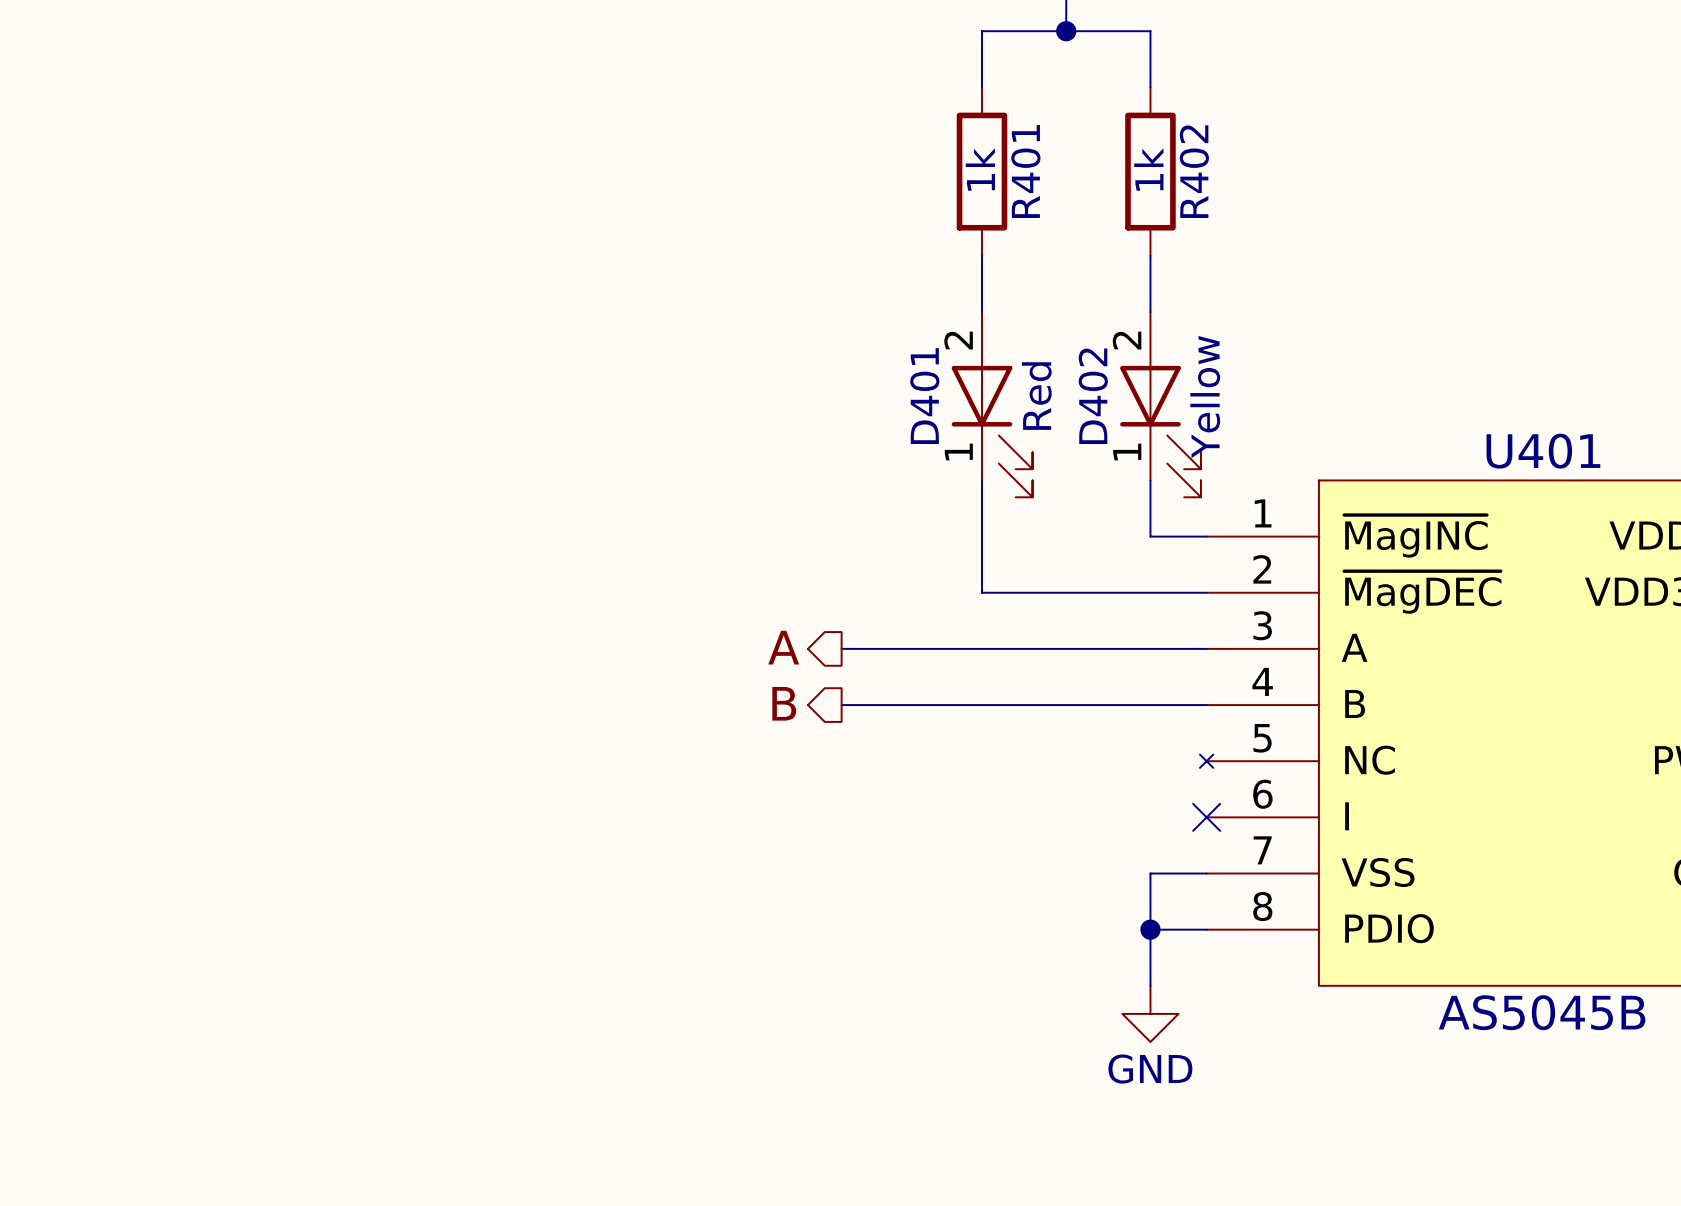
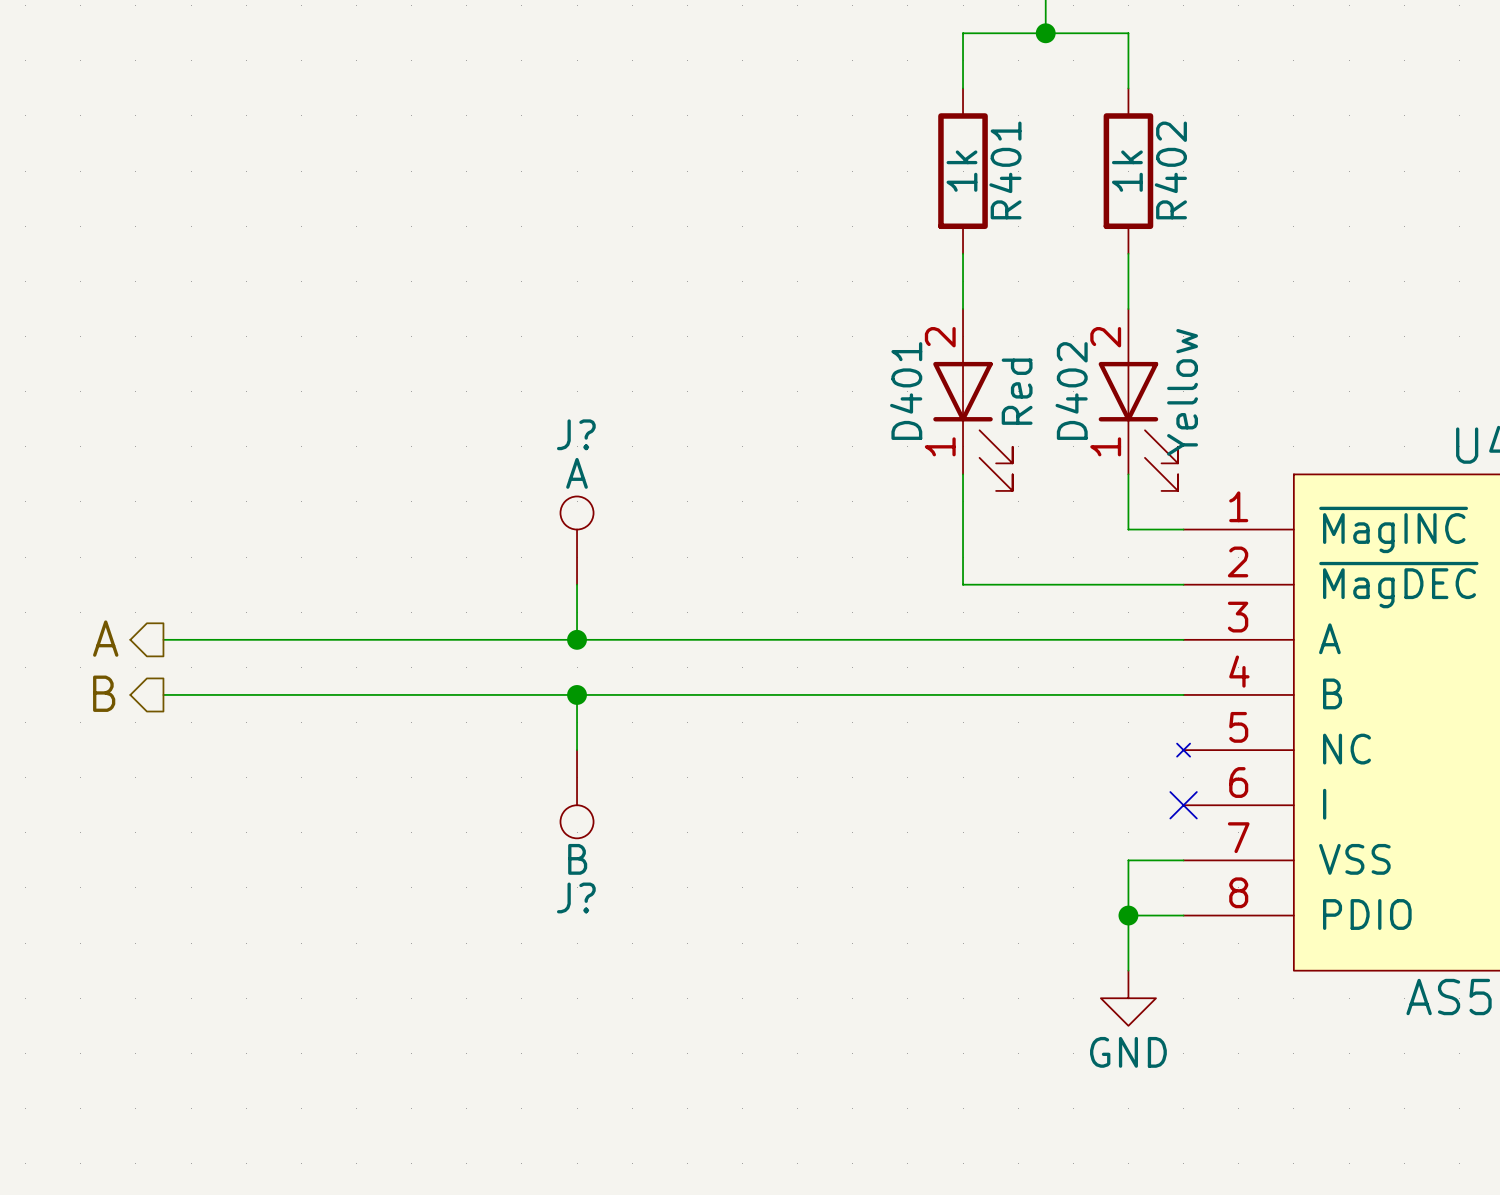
J?: none -> A (577, 540)
wire: none -> (577, 584) (577, 639)
hierarchical label: none -> A (105, 638)
hierarchical label: A (783, 647) -> none
wire: none -> (163, 639) (825, 639)
junction: none -> (577, 639)
hierarchical label: none -> B (104, 693)
hierarchical label: B (784, 703) -> none
wire: none -> (163, 694) (825, 694)
wire: none -> (577, 694) (577, 750)
junction: none -> (577, 694)
J?: none -> B (577, 794)

